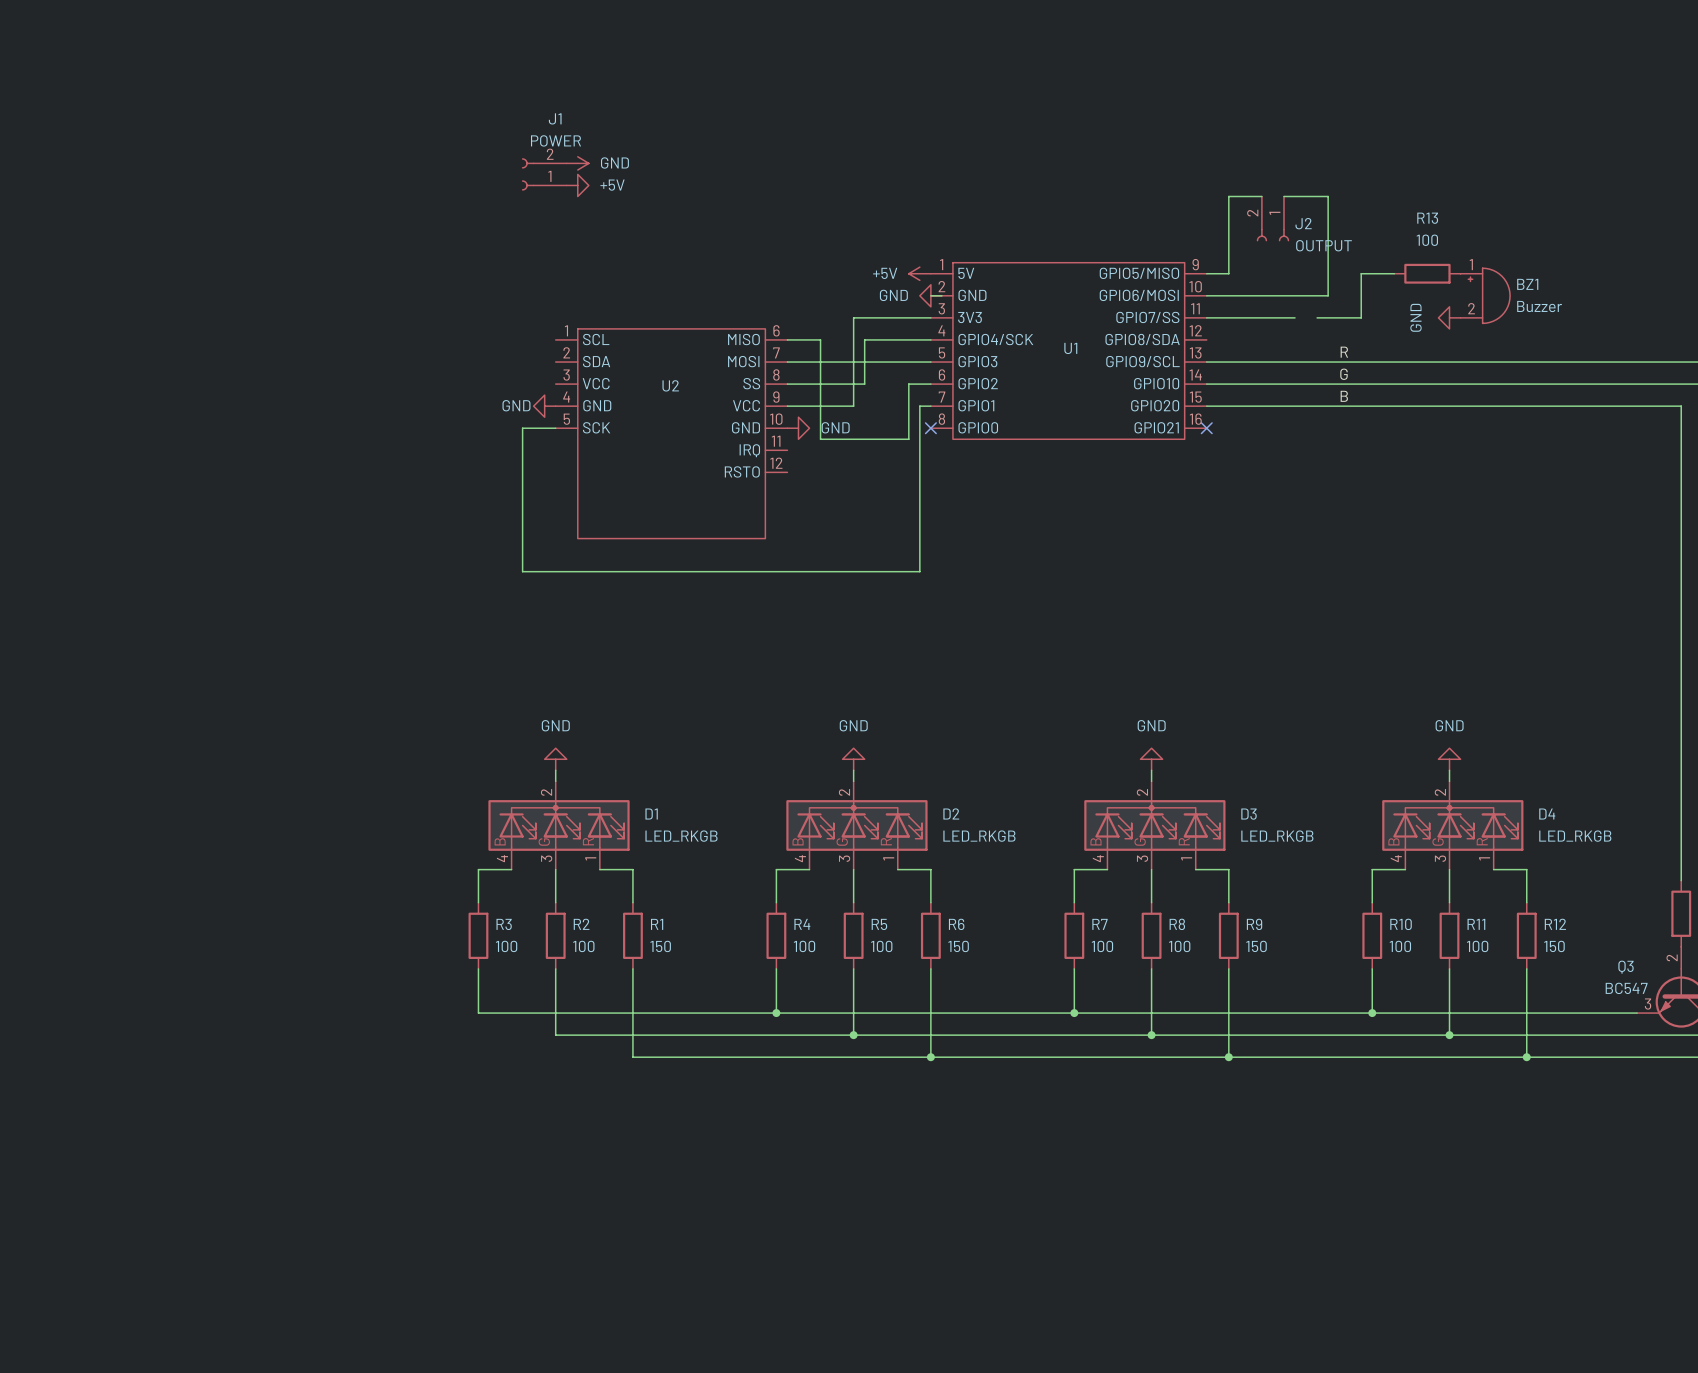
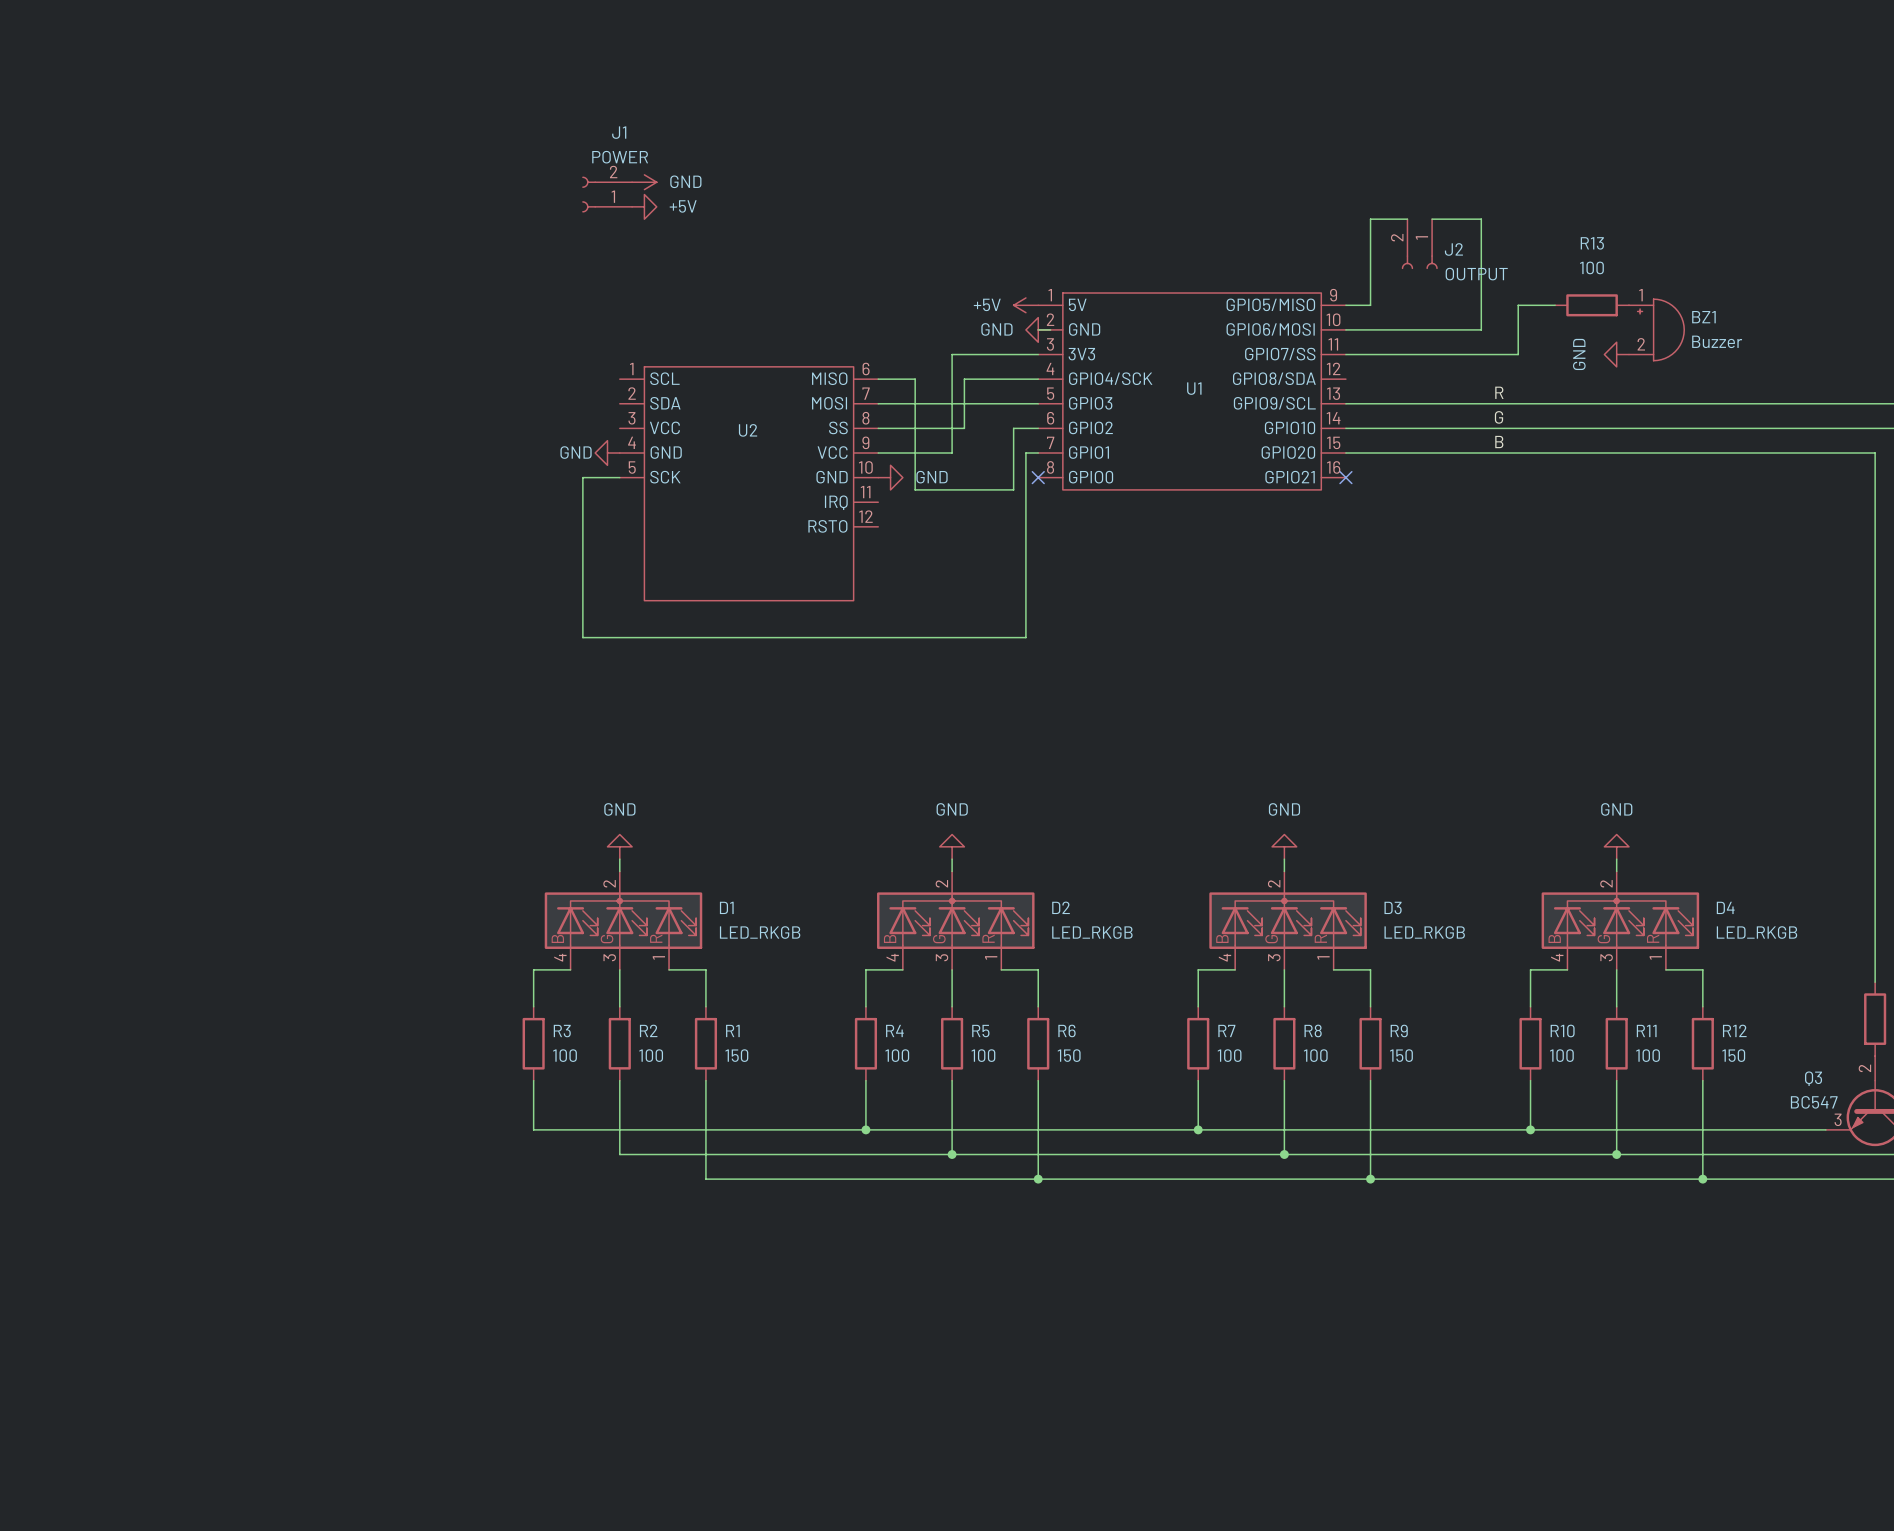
wire: none -> (1444, 354) (1468, 354)

